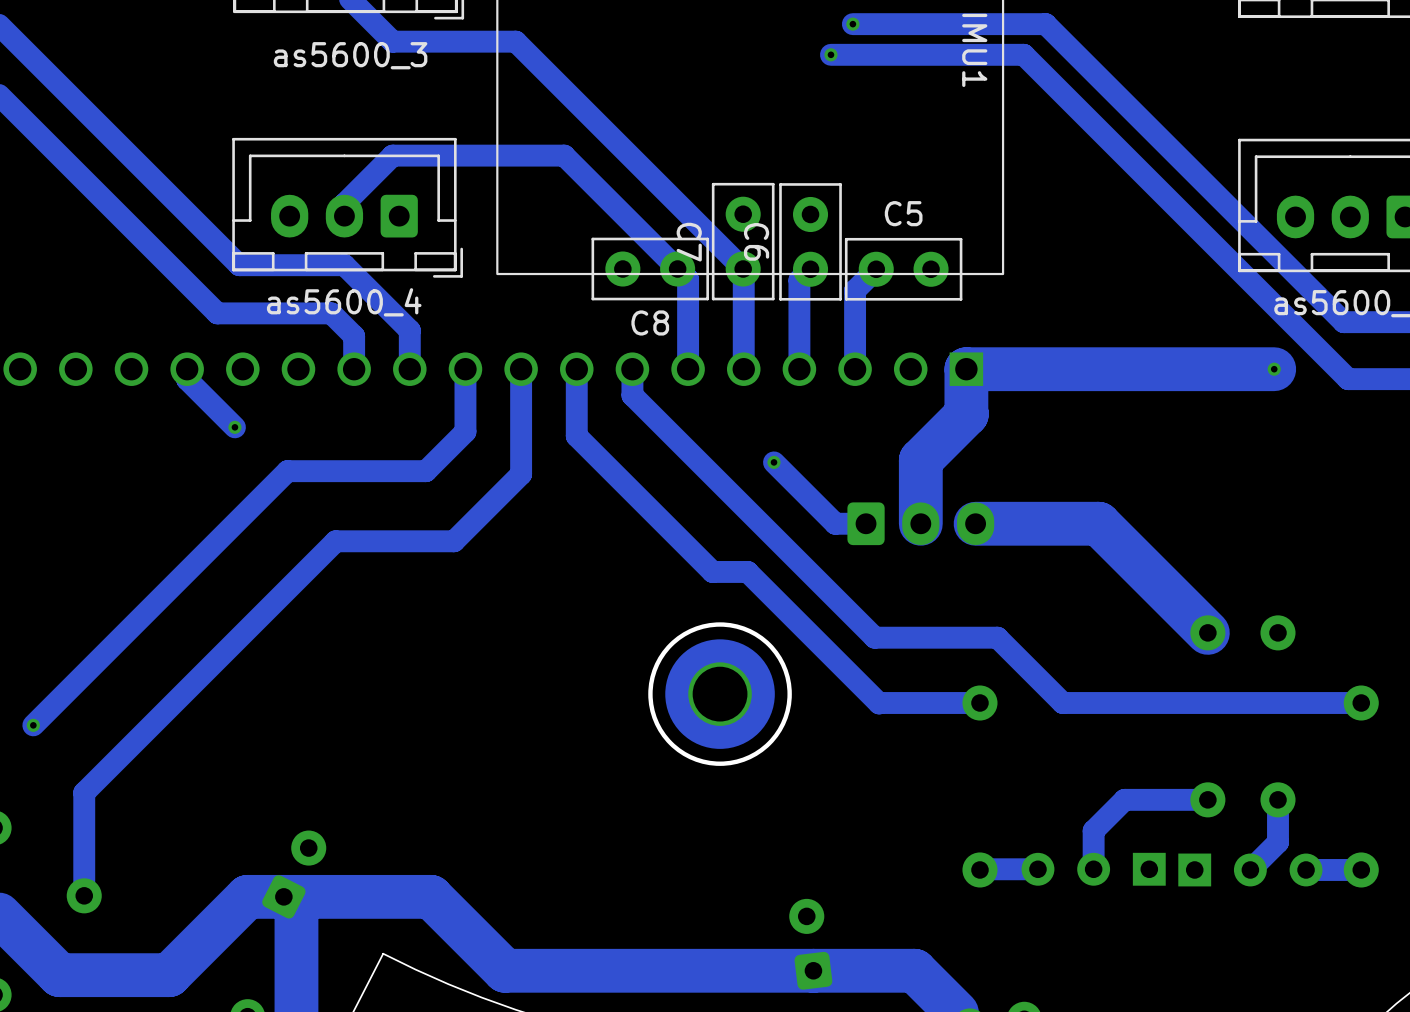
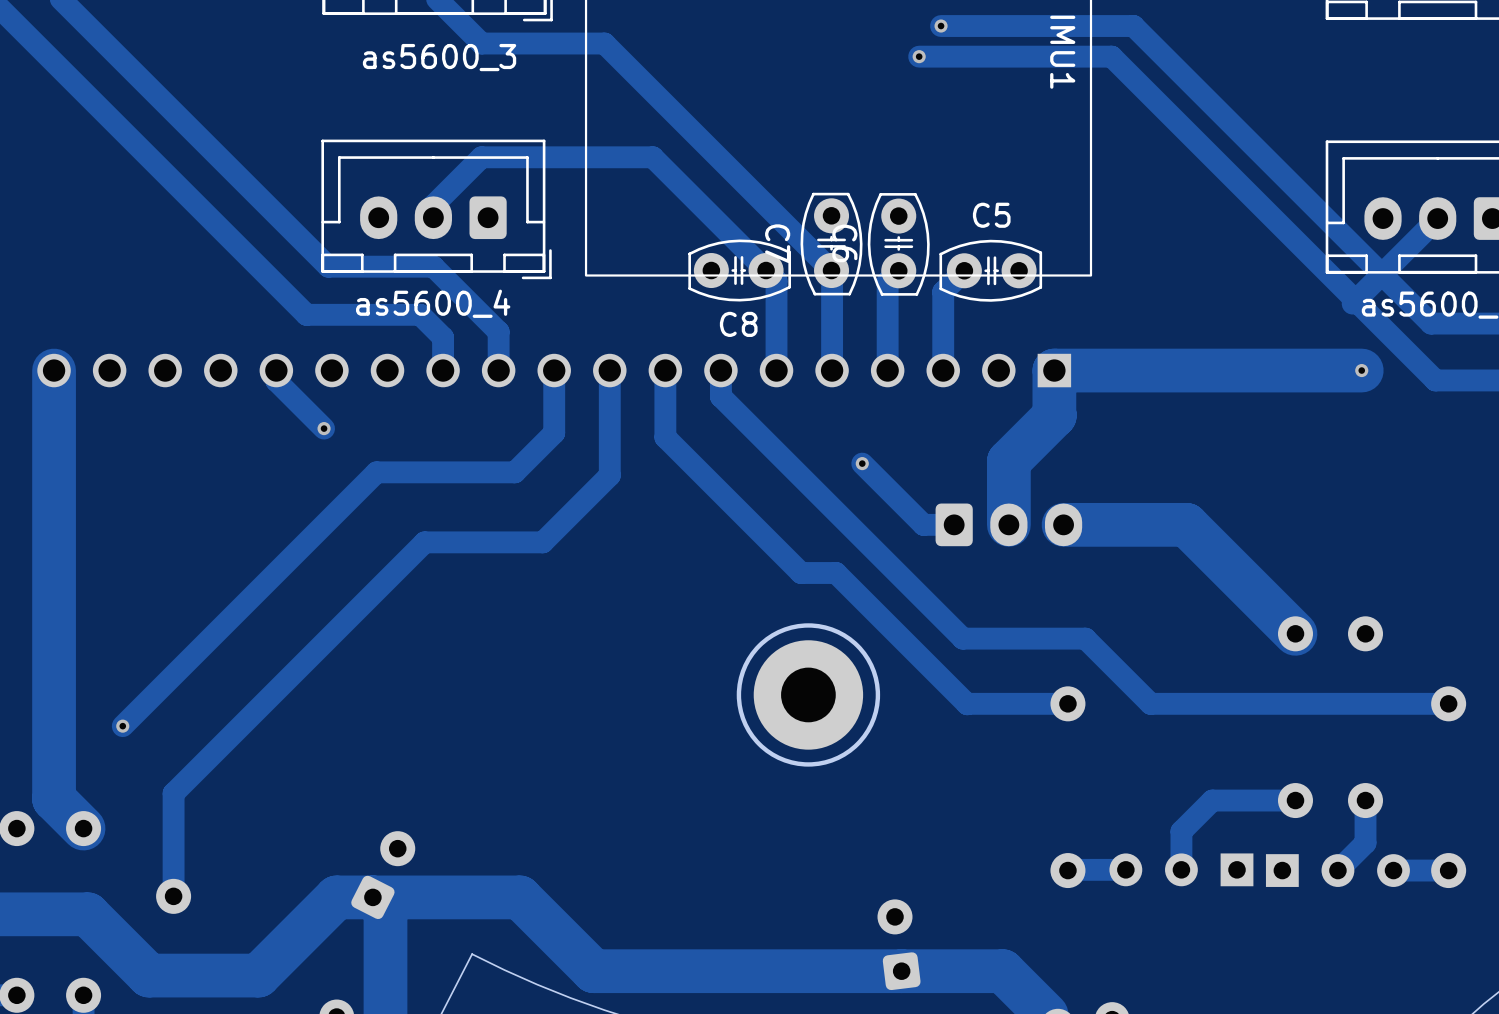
C7 footprint: [711, 182, 775, 301] -> [800, 192, 863, 296]
C6 footprint: [779, 183, 842, 301] -> [867, 193, 930, 296]
track: none -> (1437, 218) (1352, 303)
C8 footprint: [591, 237, 709, 301] -> [688, 239, 792, 302]
C5 footprint: [844, 237, 963, 301] -> [939, 239, 1043, 302]

